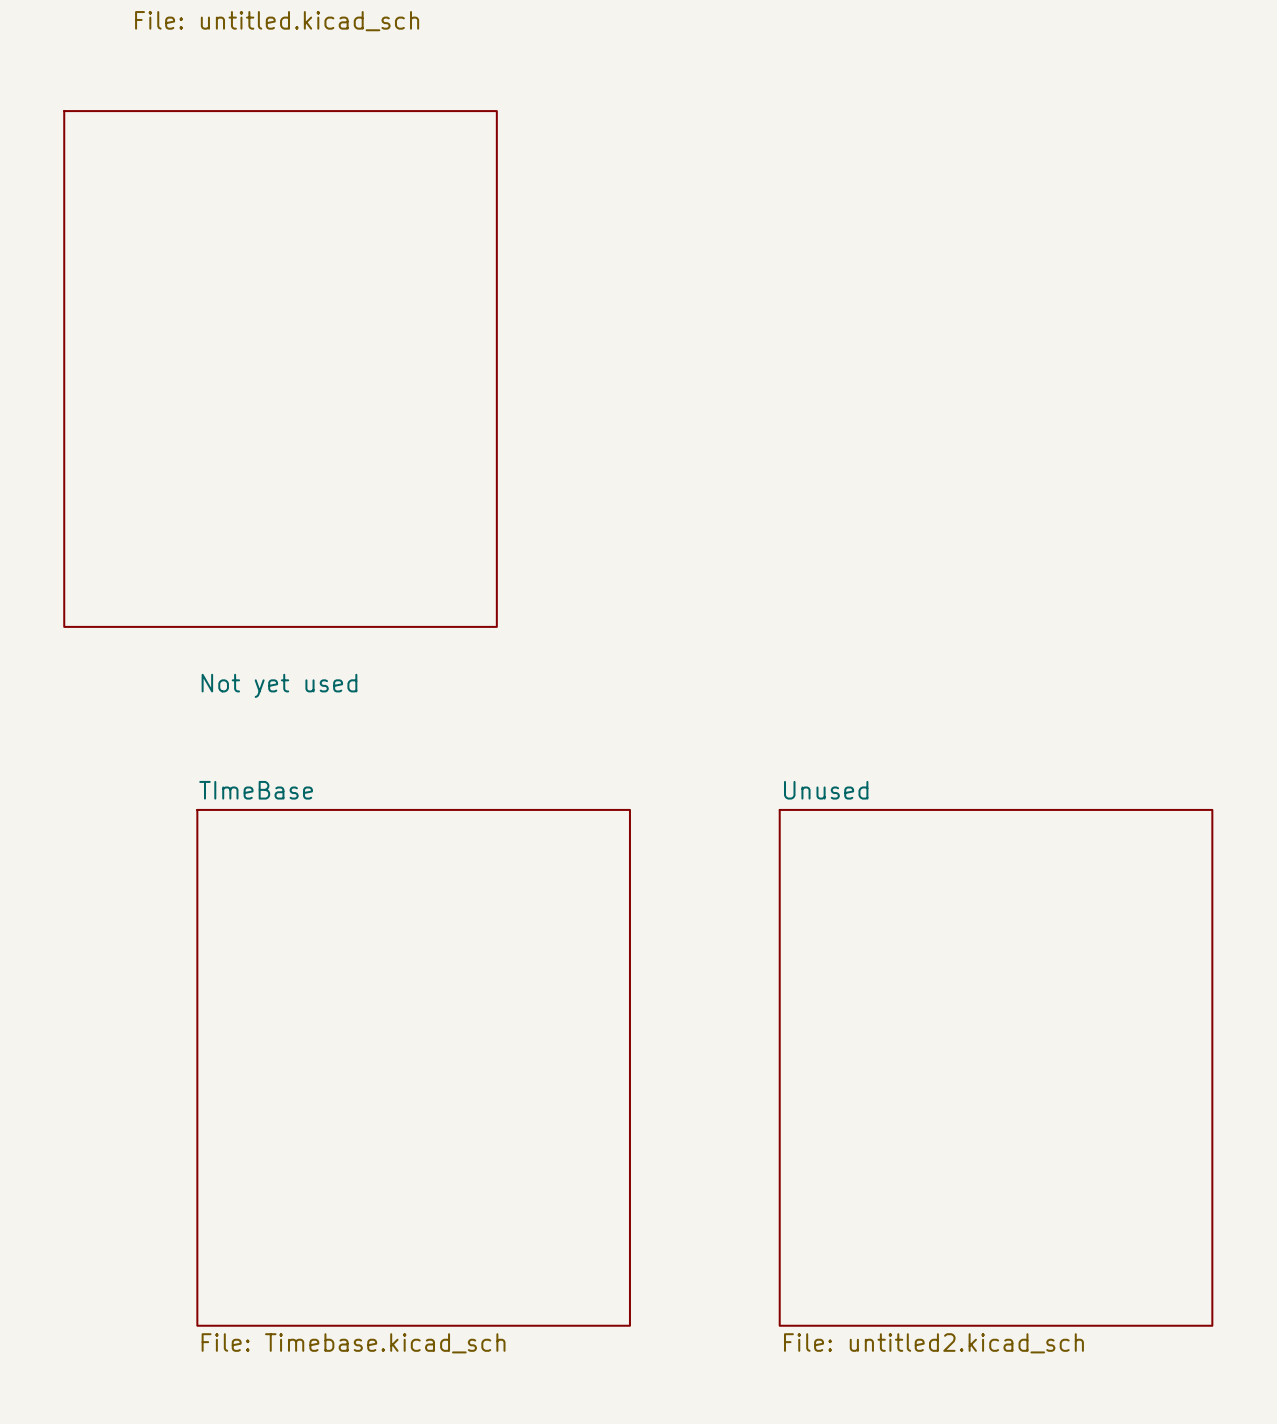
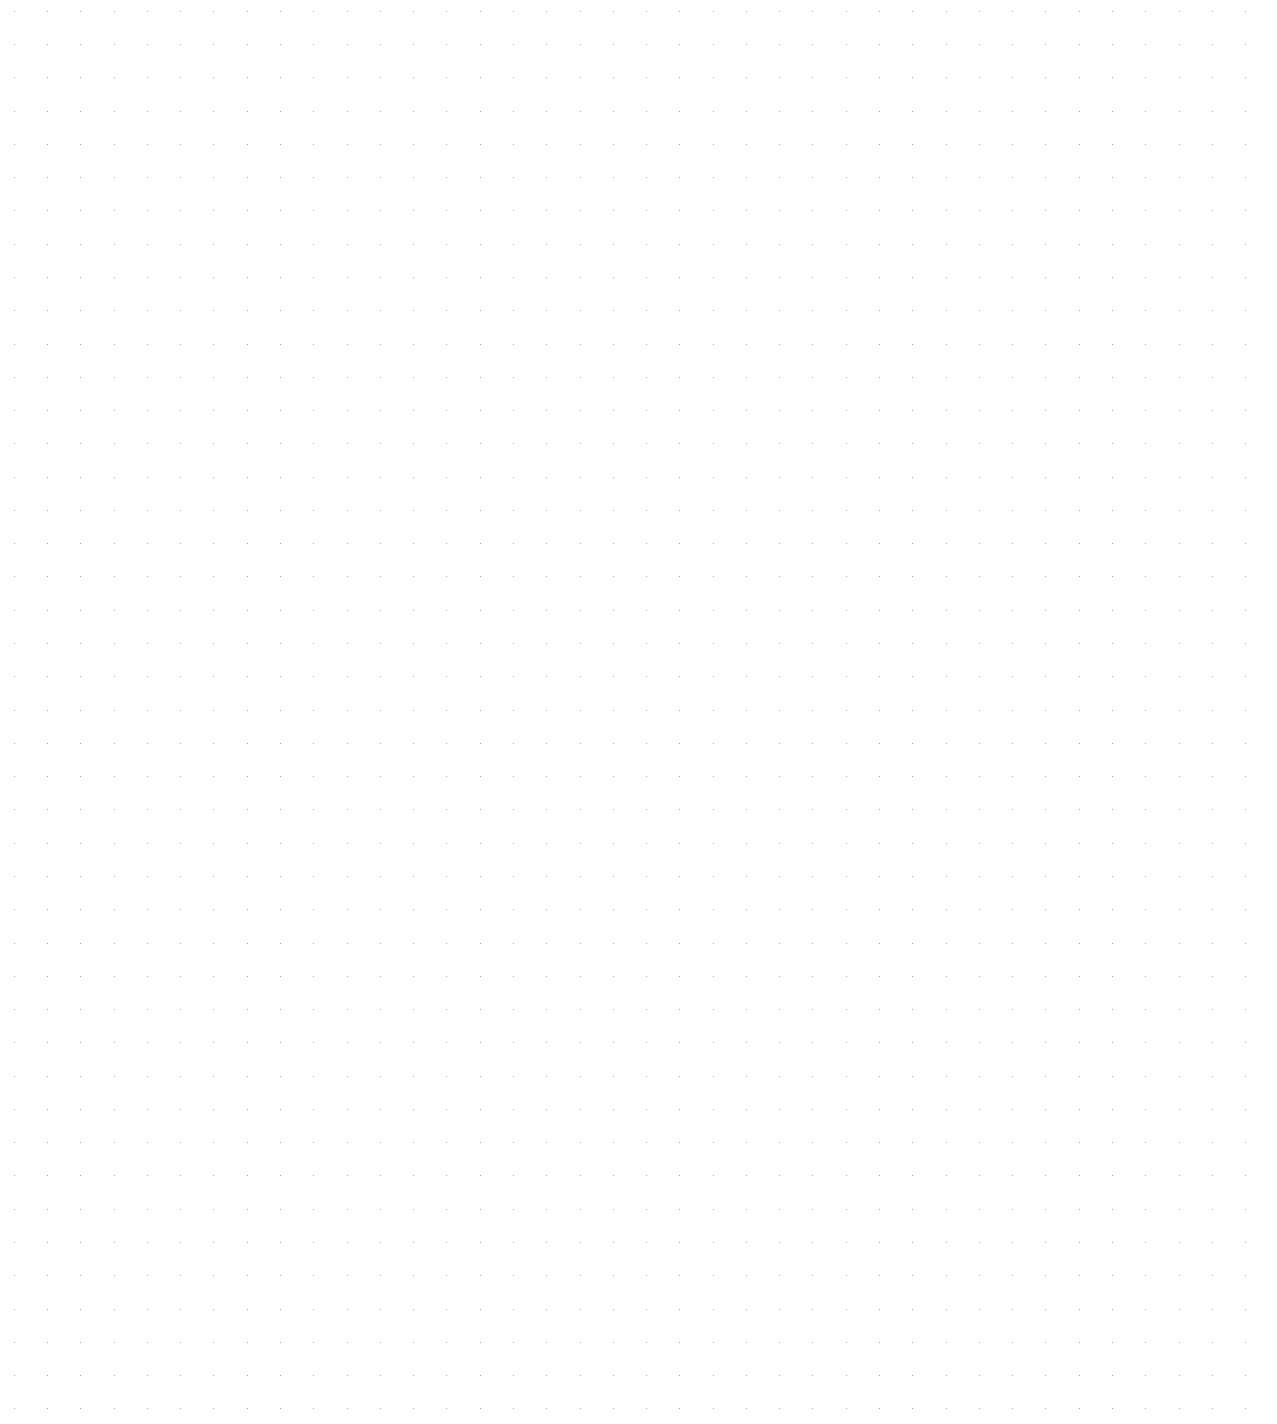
sheet Not yet used: File: untitled.kicad_sch (280, 368) -> none
sheet TImeBase: File: Timebase.kicad_sch (413, 1067) -> none
sheet Unused: File: untitled2.kicad_sch (996, 1067) -> none

